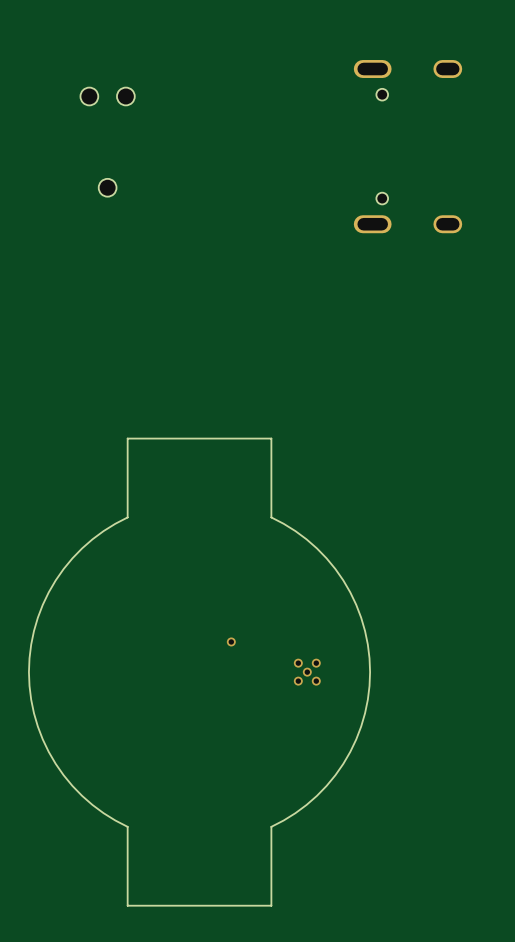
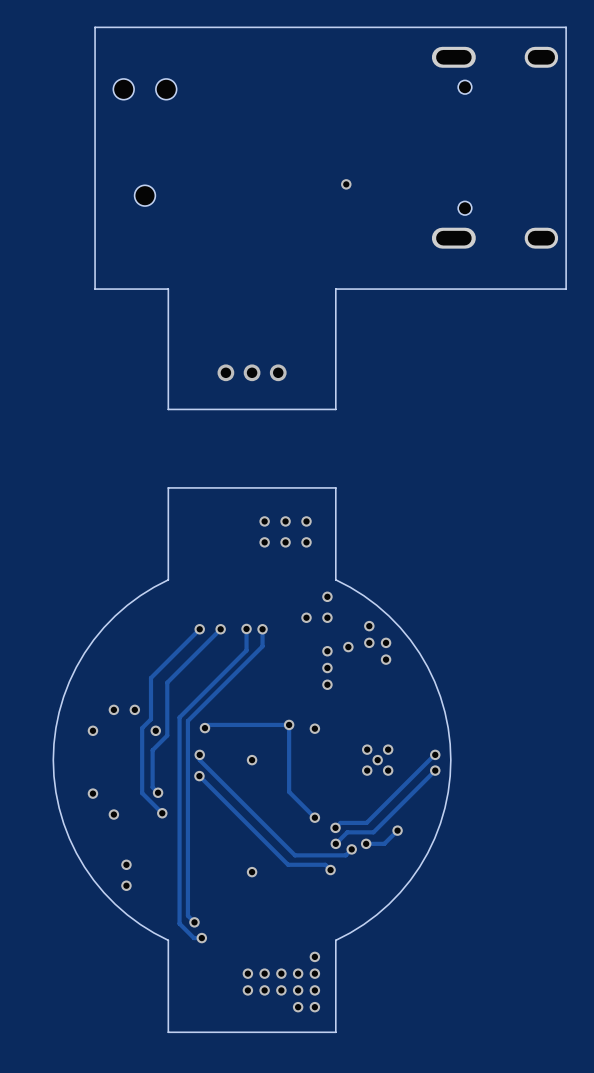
board edge: none -> (566, 27) (566, 289) (335, 289) (335, 409) (168, 409) (168, 289) (95, 289) (95, 27) (566, 27)
via: none -> (346, 184)
via: none -> (225, 372)
via: none -> (252, 372)
via: none -> (278, 372)
via: none -> (264, 521)
via: none -> (285, 521)
via: none -> (306, 521)
via: none -> (264, 542)
via: none -> (285, 542)
via: none -> (306, 542)
via: none -> (327, 596)
via: none -> (306, 617)
via: none -> (327, 617)
via: none -> (369, 626)
track: none -> (199, 629) (150, 678) (150, 719) (142, 728) (142, 793) (162, 813)
via: none -> (199, 629)
track: none -> (220, 629) (167, 682) (167, 735) (152, 750) (152, 787) (158, 792)
via: none -> (220, 629)
track: none -> (246, 628) (246, 650) (179, 717) (179, 923) (193, 938) (201, 938)
via: none -> (246, 628)
track: none -> (262, 629) (262, 646) (187, 720) (187, 915) (194, 922)
via: none -> (262, 629)
via: none -> (369, 642)
via: none -> (386, 642)
via: none -> (348, 647)
via: none -> (327, 651)
via: none -> (386, 659)
via: none -> (327, 667)
via: none -> (327, 684)
via: none -> (113, 709)
via: none -> (134, 709)
track: none -> (204, 728) (208, 724) (289, 724) (289, 791) (314, 817)
via: none -> (204, 728)
via: none -> (314, 728)
via: none -> (92, 730)
via: none -> (155, 730)
track: none -> (199, 754) (199, 760) (294, 855) (345, 855) (351, 849)
via: none -> (199, 754)
track: none -> (435, 754) (366, 822) (340, 822) (335, 827)
via: none -> (435, 754)
via: none -> (252, 760)
track: none -> (435, 770) (373, 832) (347, 832) (335, 843)
via: none -> (435, 770)
track: none -> (199, 776) (288, 864) (325, 864) (330, 870)
via: none -> (199, 776)
via: none -> (92, 793)
via: none -> (158, 792)
via: none -> (162, 813)
via: none -> (113, 814)
via: none -> (314, 817)
via: none -> (335, 827)
track: none -> (397, 830) (384, 843) (366, 843)
via: none -> (397, 830)
via: none -> (335, 843)
via: none -> (366, 843)
via: none -> (351, 849)
via: none -> (126, 864)
via: none -> (330, 870)
via: none -> (252, 872)
via: none -> (126, 885)
via: none -> (194, 922)
via: none -> (201, 938)
via: none -> (314, 956)
via: none -> (247, 973)
via: none -> (264, 973)
via: none -> (281, 973)
via: none -> (298, 973)
via: none -> (314, 973)
via: none -> (247, 990)
via: none -> (264, 990)
via: none -> (281, 990)
via: none -> (298, 990)
via: none -> (314, 990)
via: none -> (298, 1007)
via: none -> (314, 1007)

